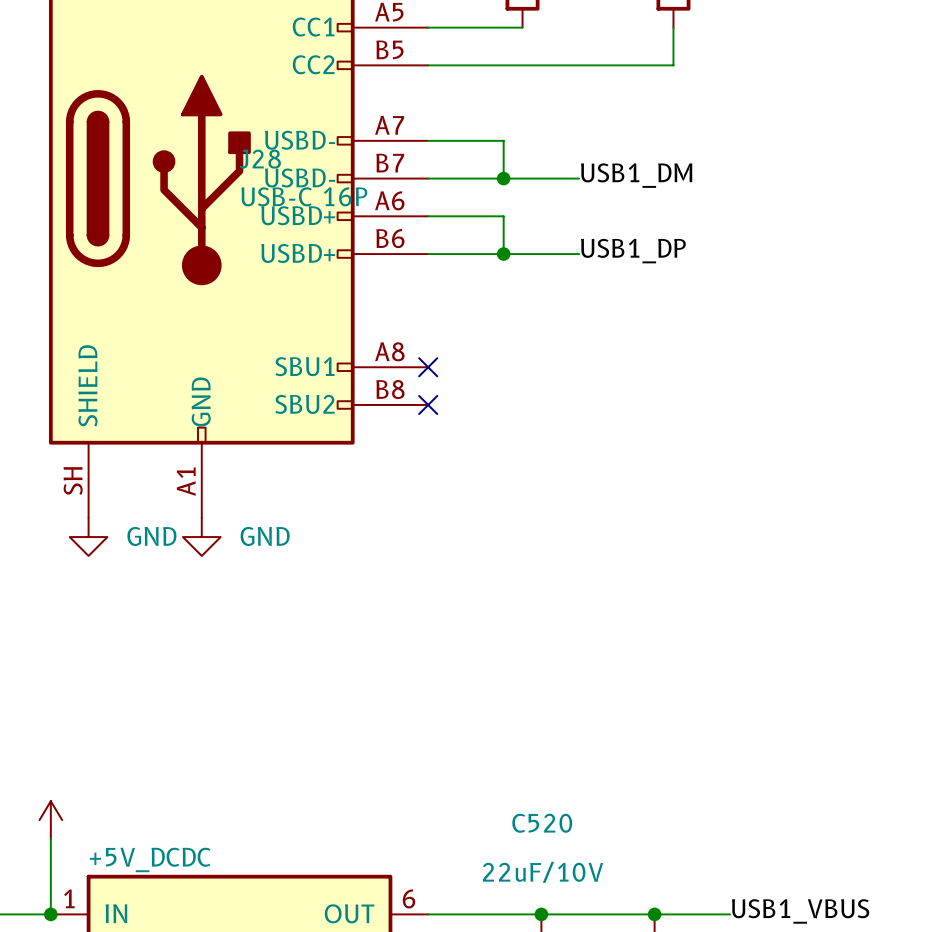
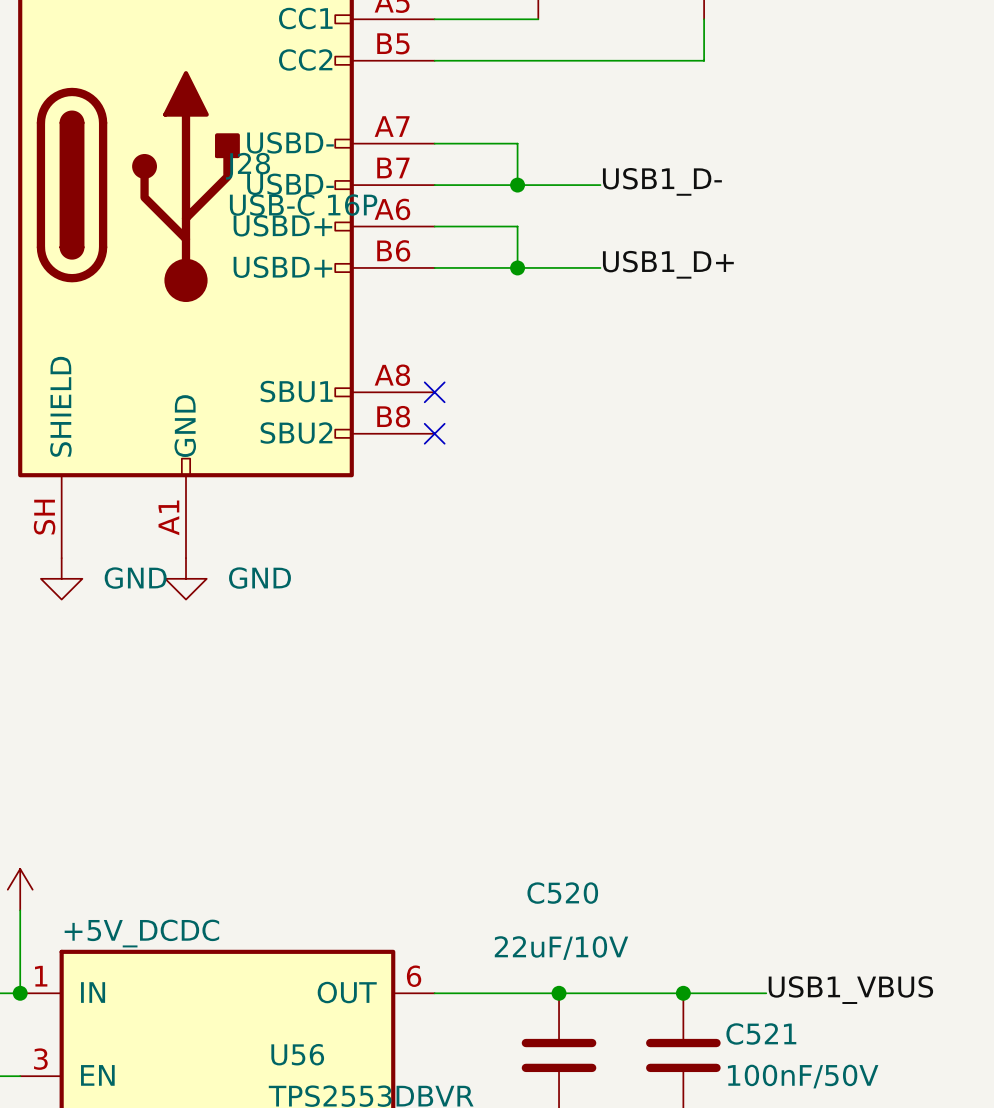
label: USB1_DM (636, 175) -> USB1_D- (662, 181)
label: USB1_DP (633, 251) -> USB1_D+ (668, 264)

